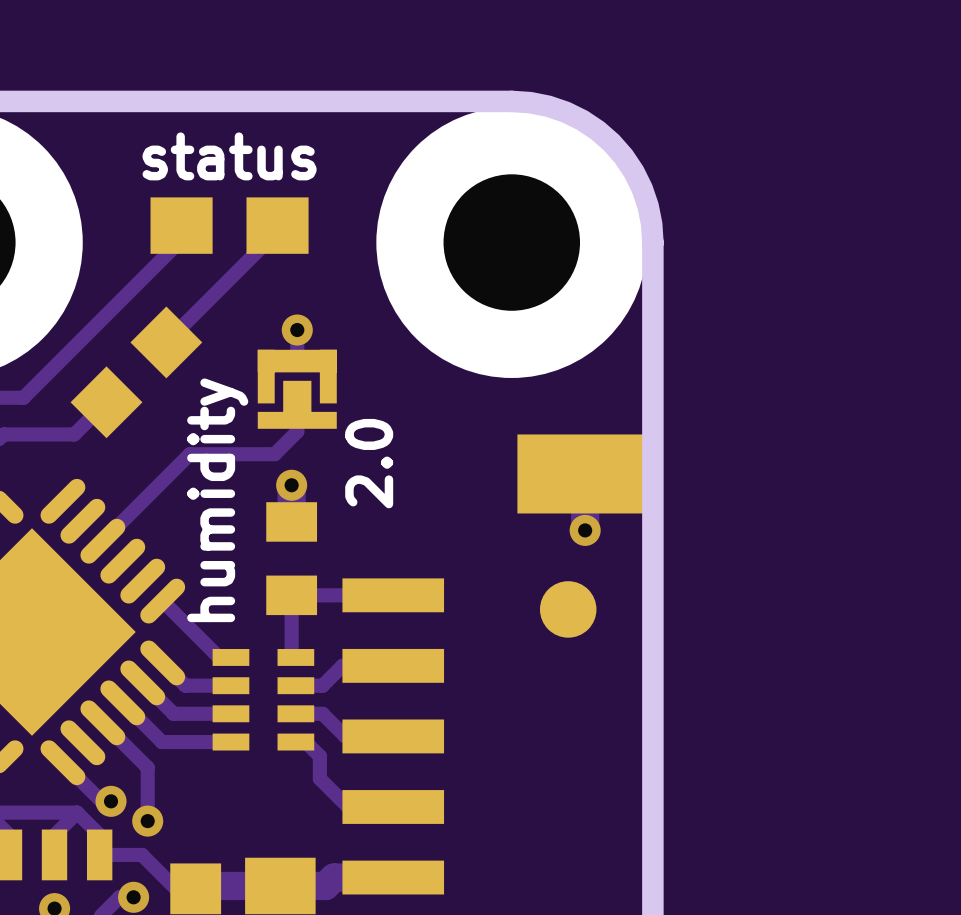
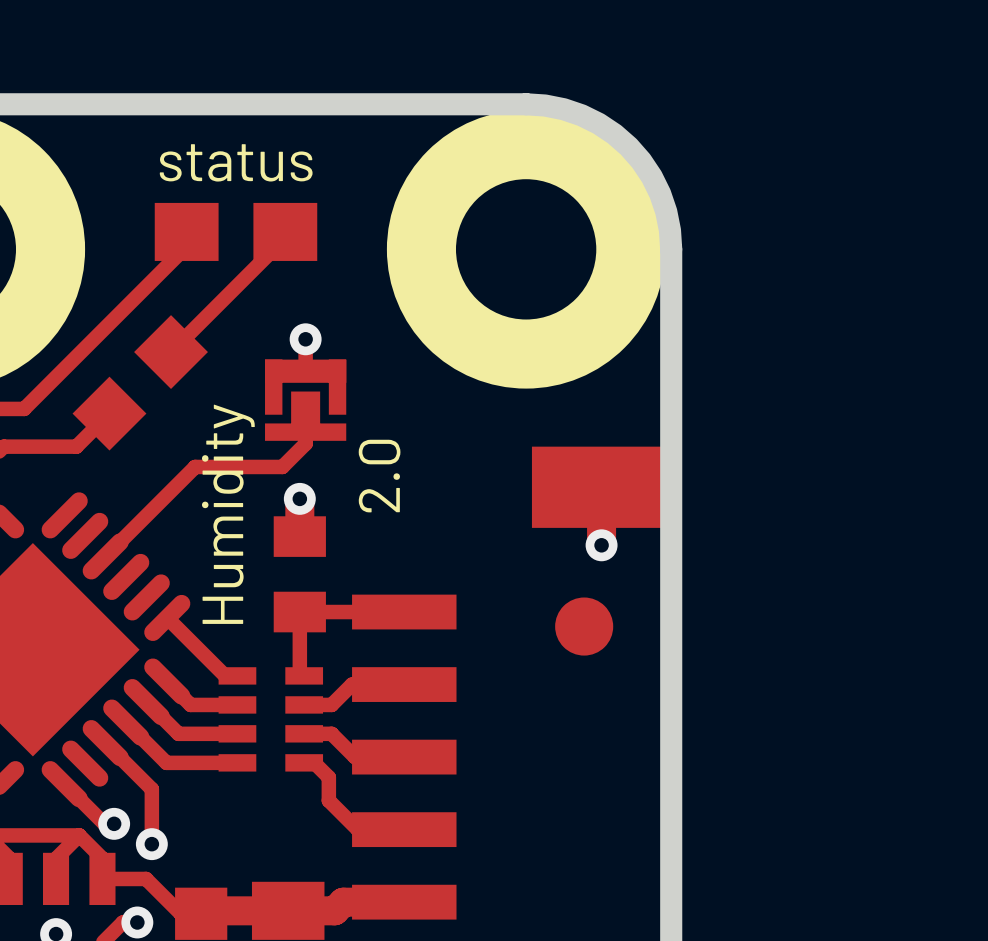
text: humidity (217, 500) -> Humidity (228, 514)

